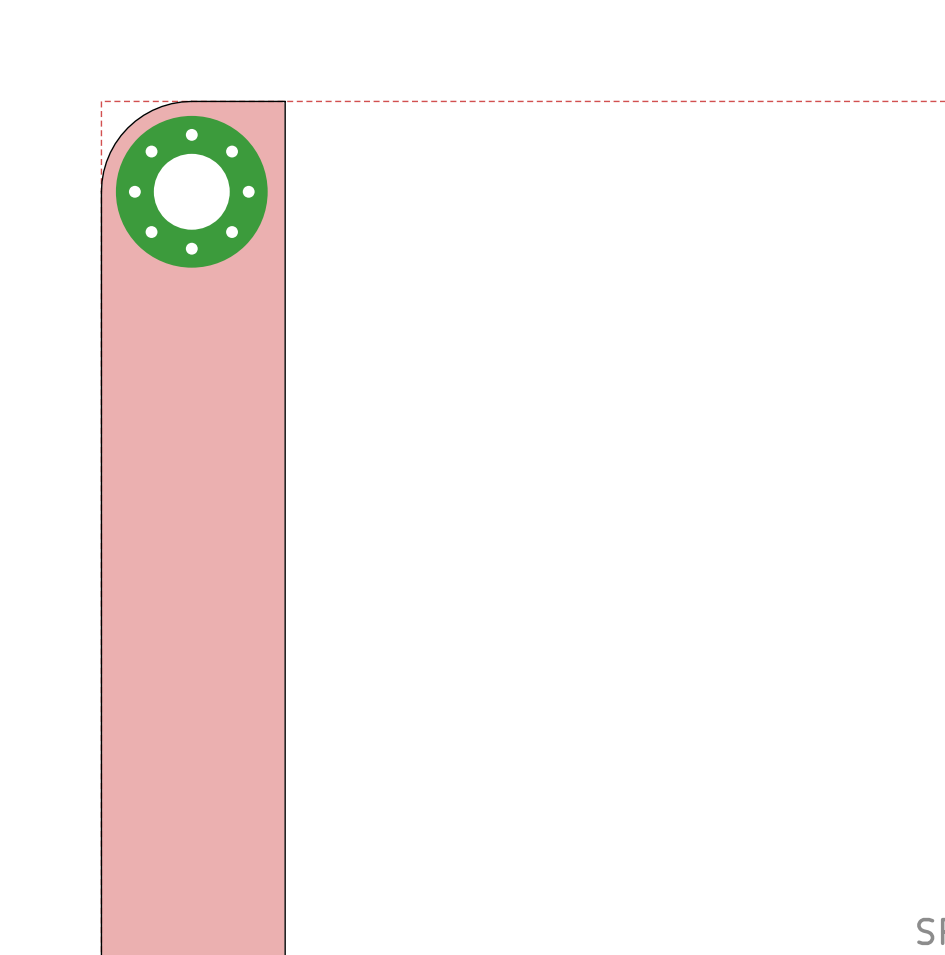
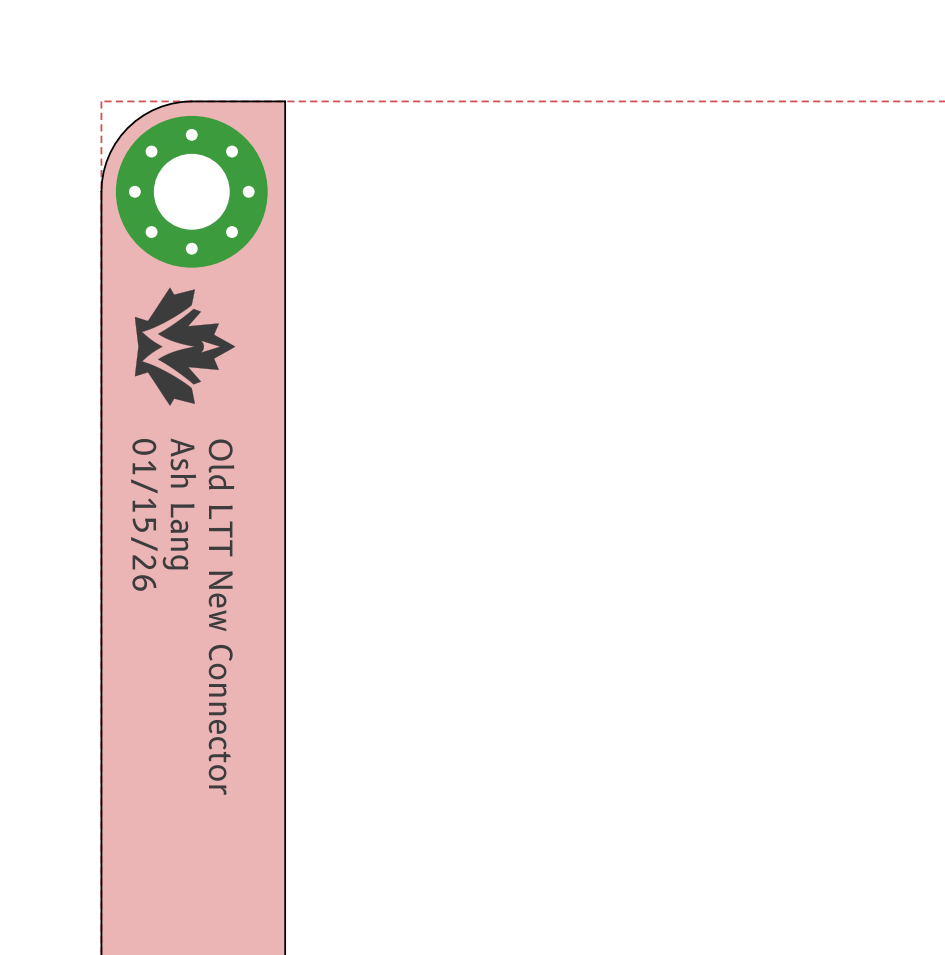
drawing: none -> [134, 287, 236, 406]
text: none -> Ash Lang (179, 503)
text: none -> 01/15/26 (144, 514)
text: none -> Old LTT New Connector (221, 617)

